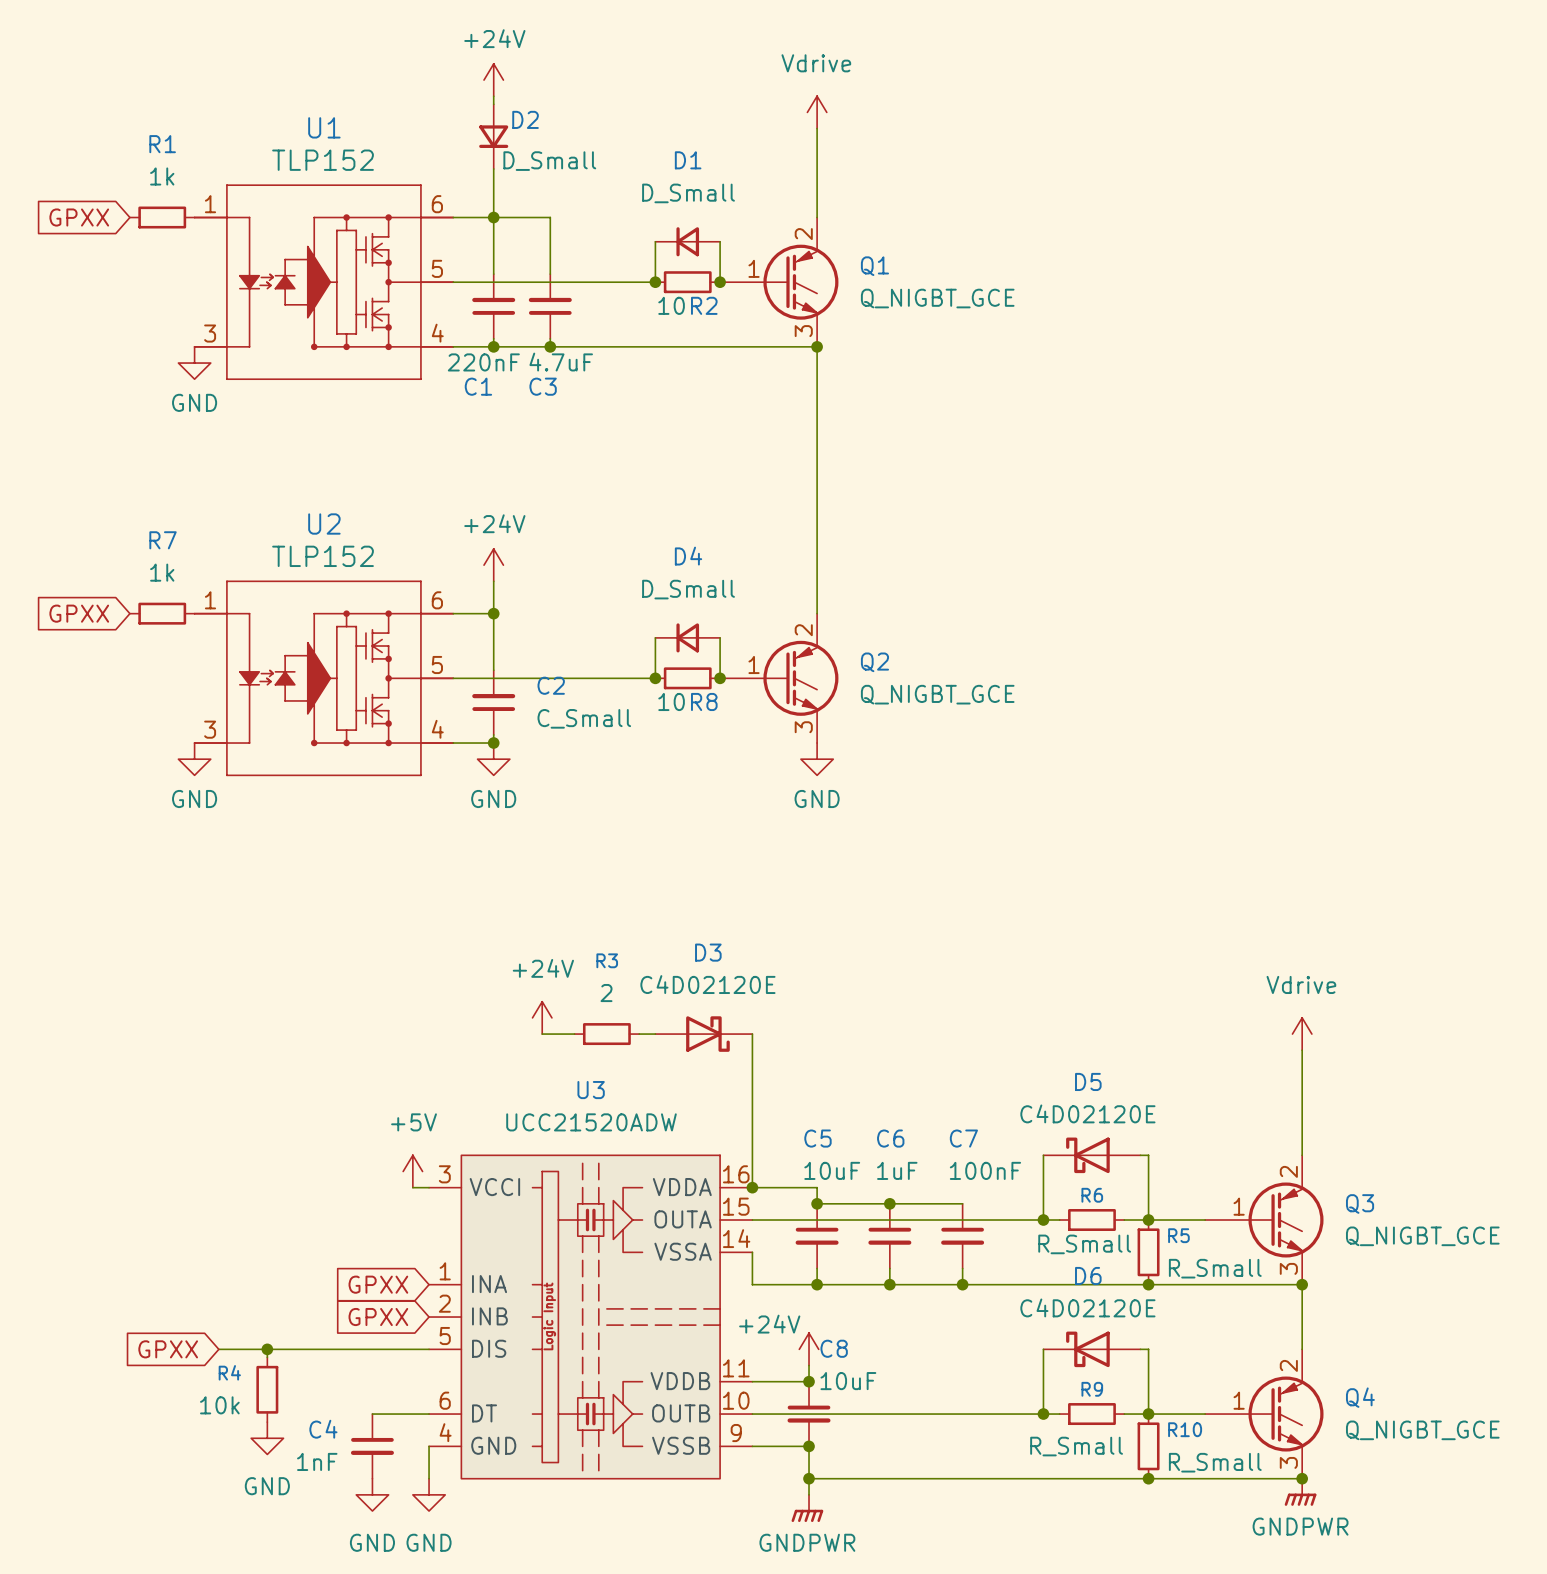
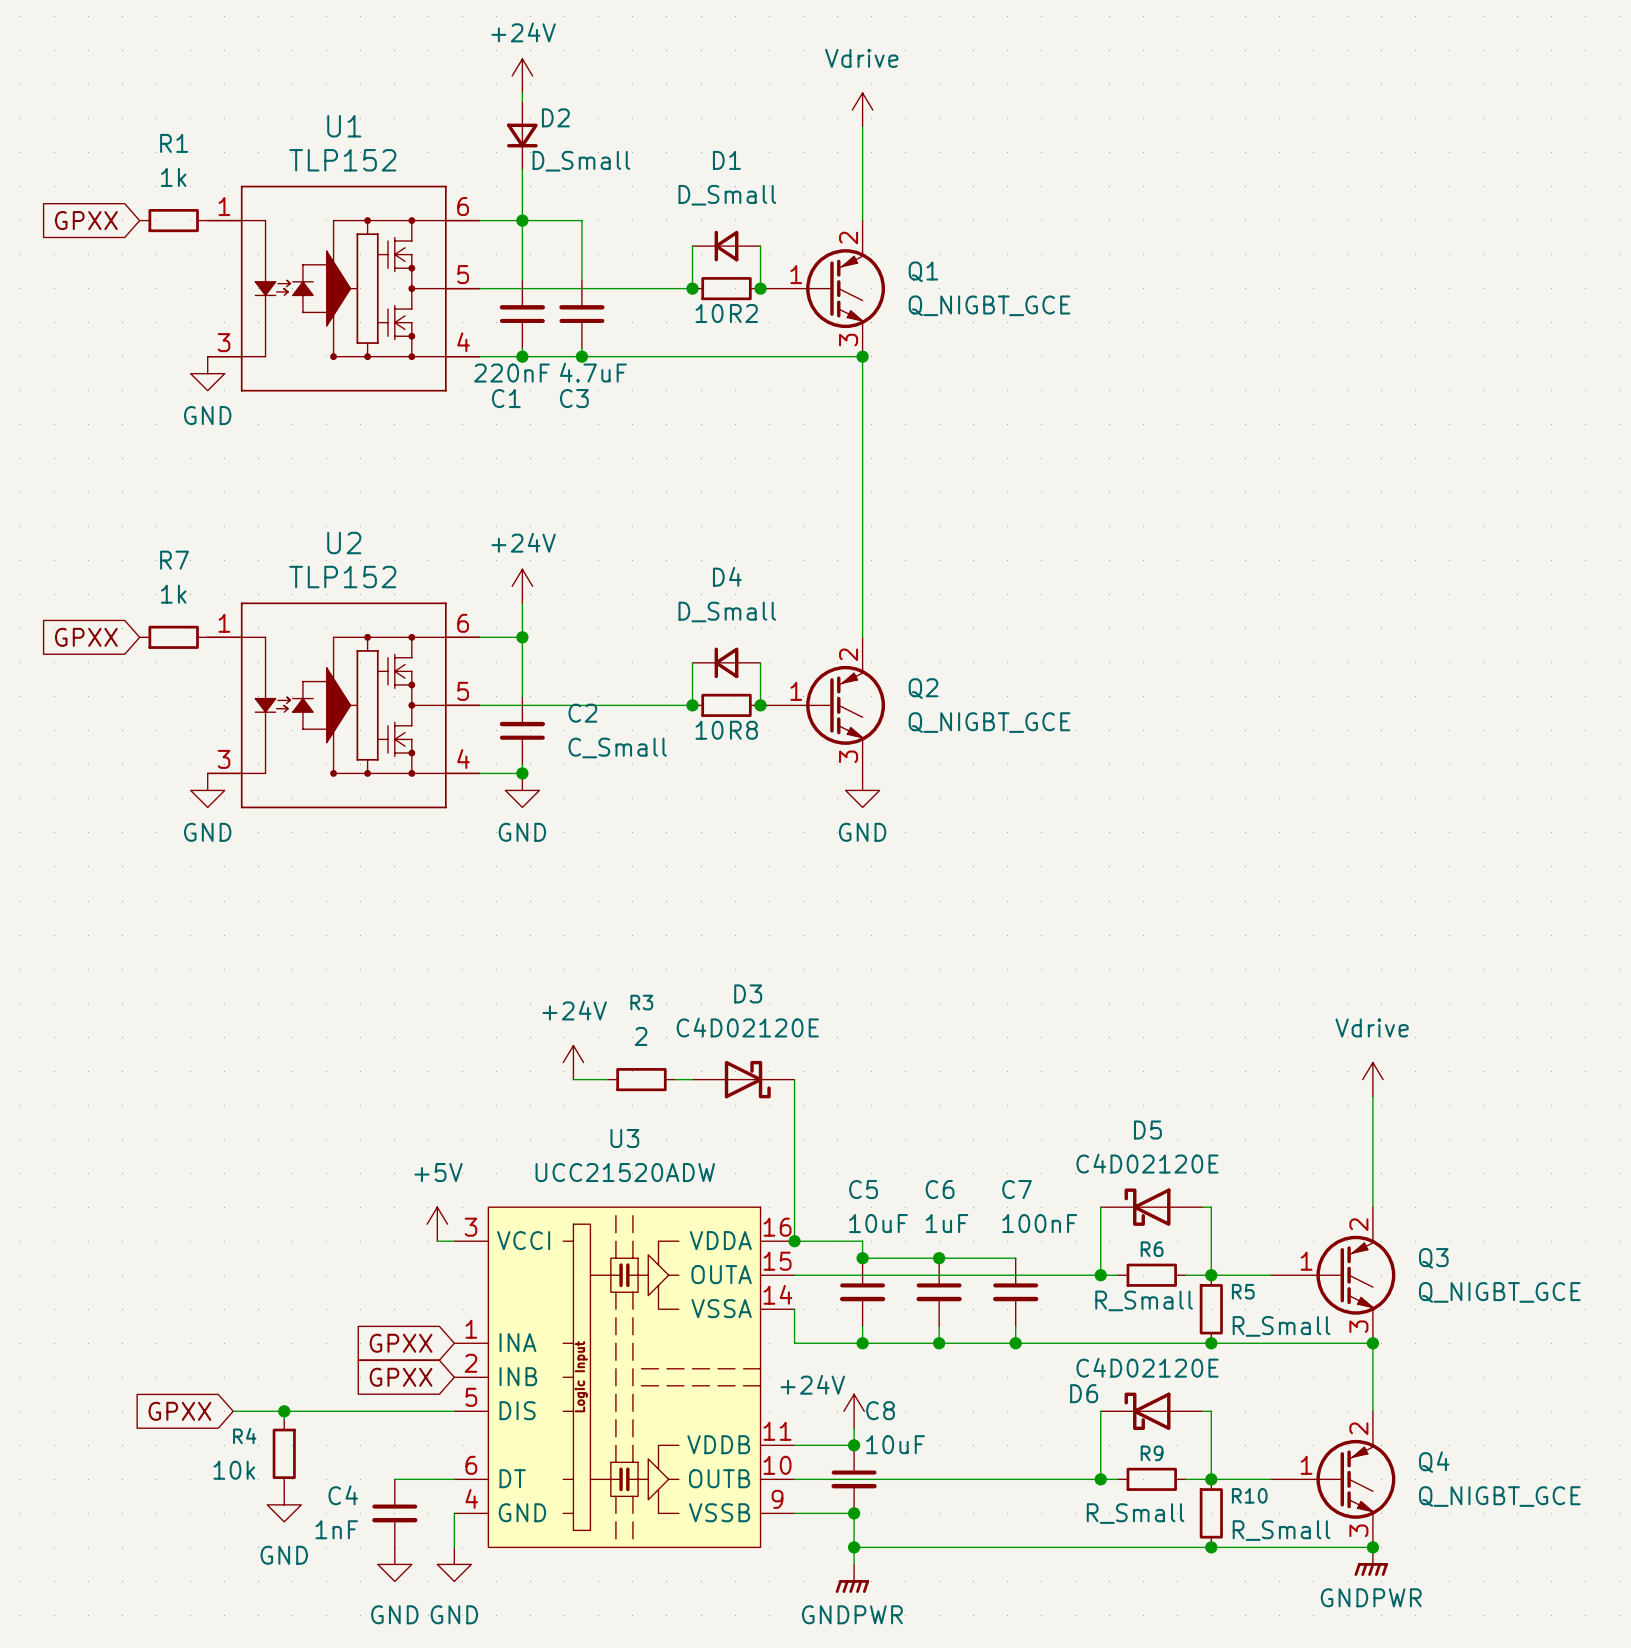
D6 name position: D6 (1088, 1275) -> D6 (1084, 1393)

